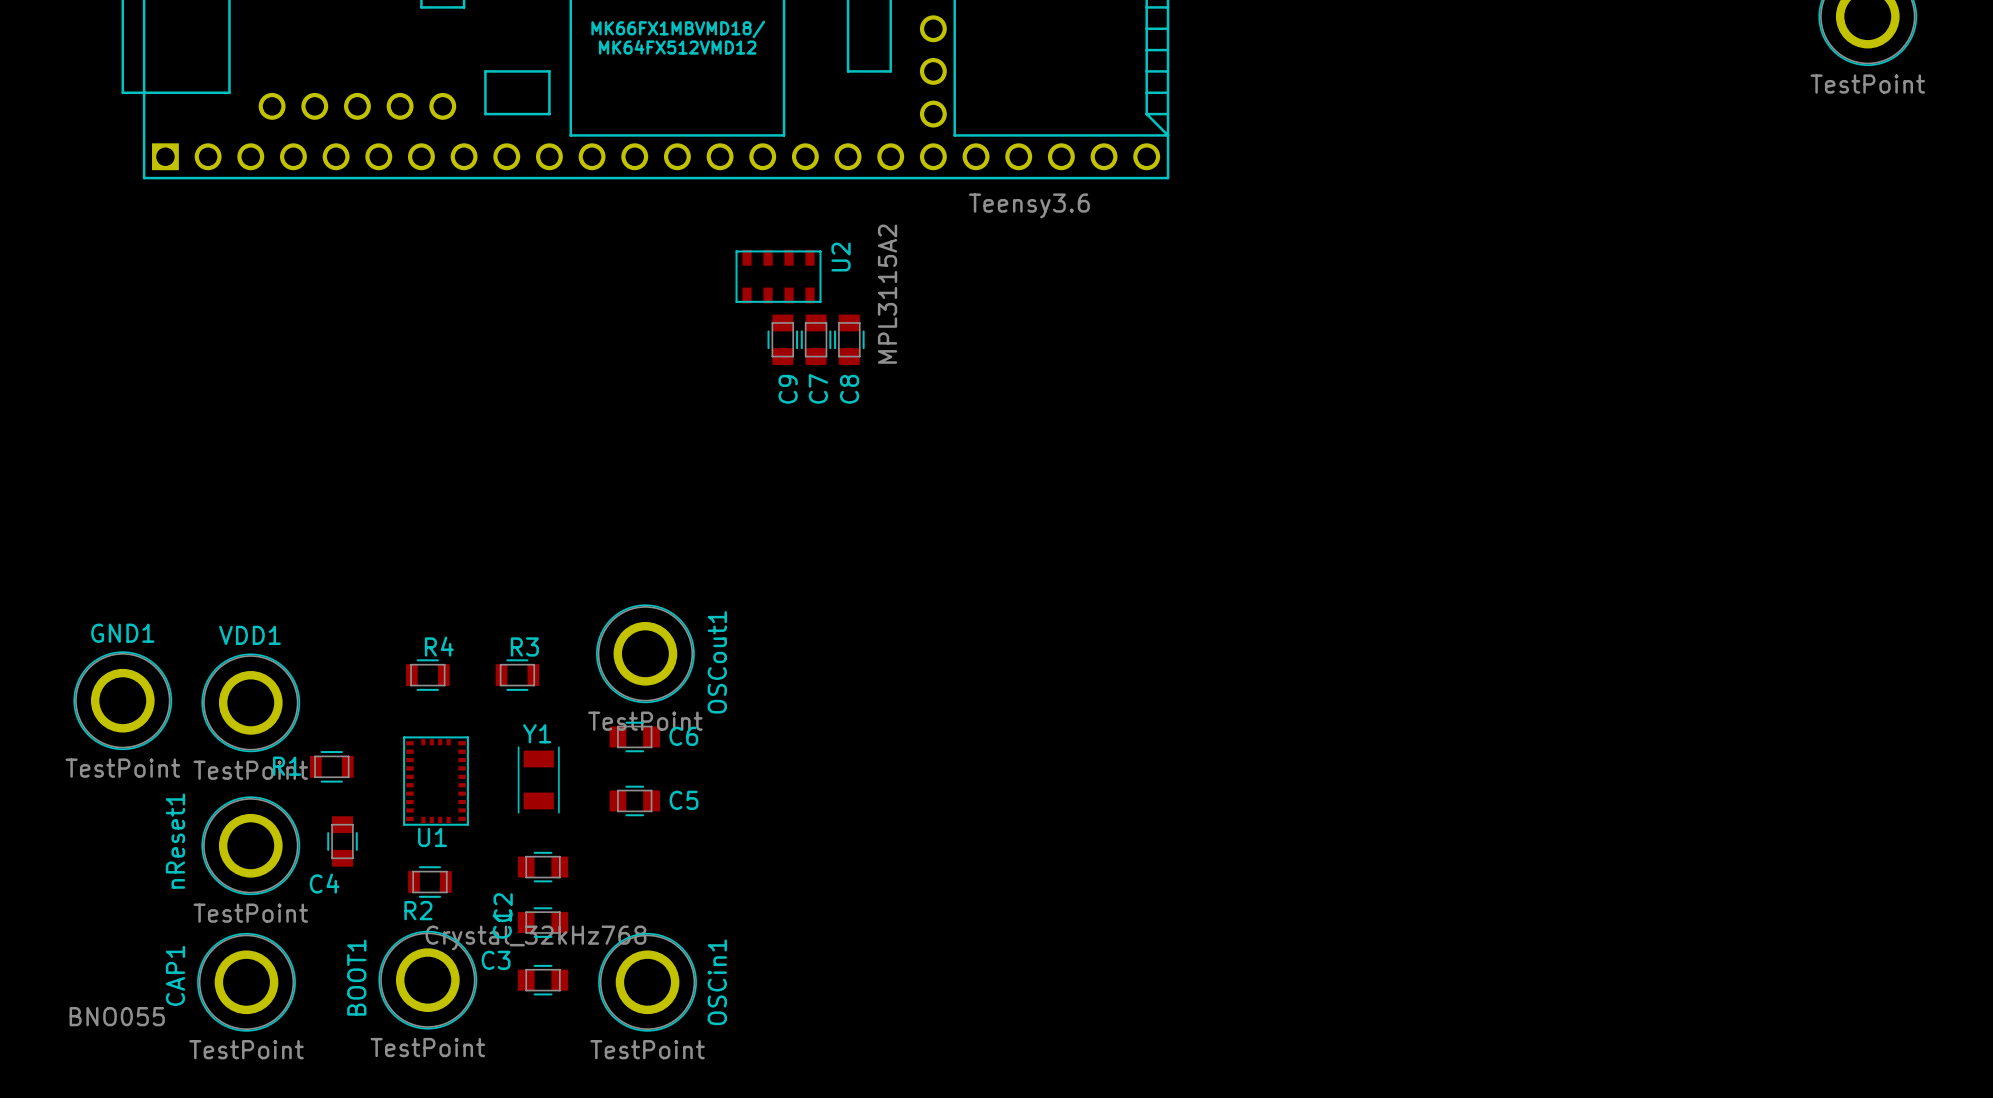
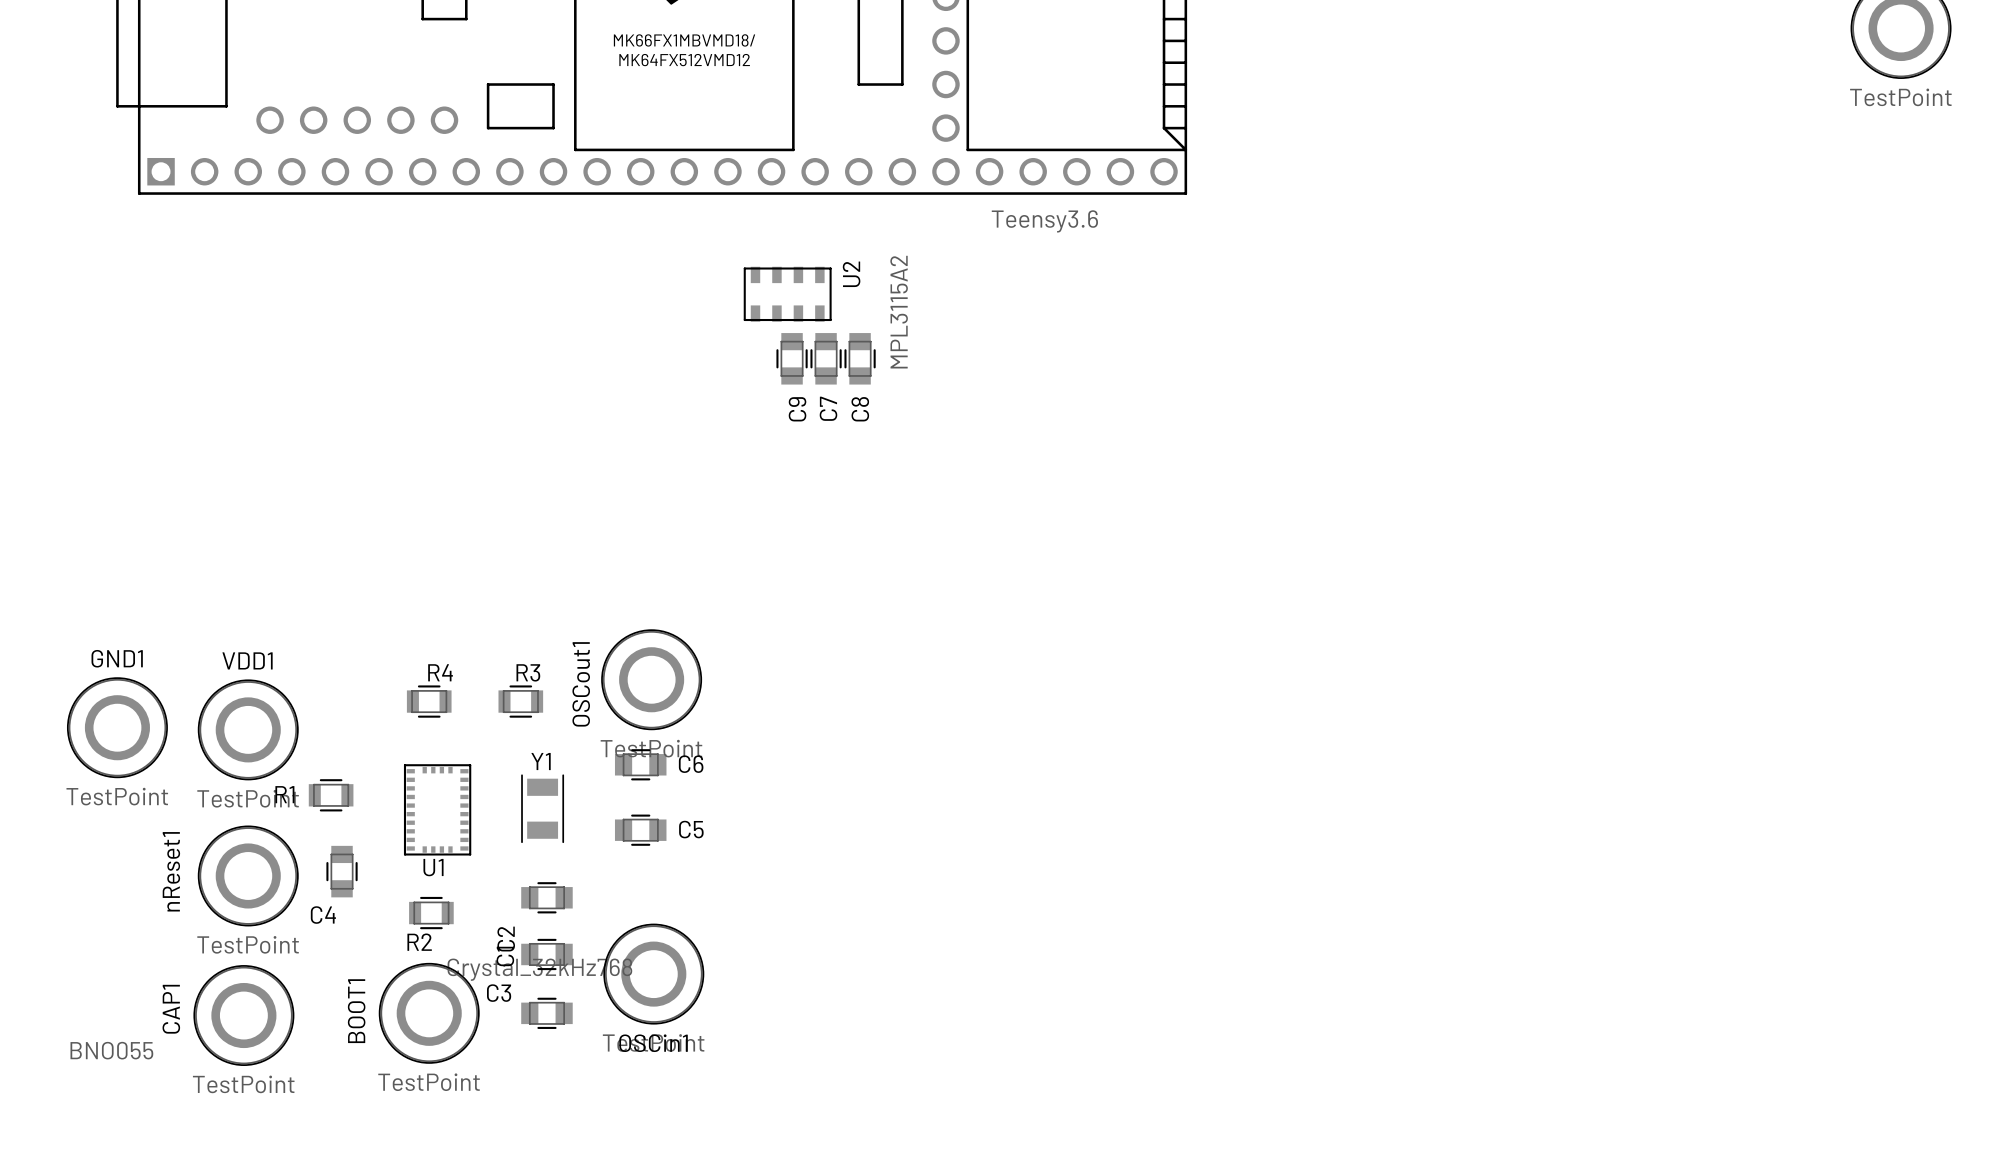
OSCout1 name position: OSCout1 (717, 662) -> OSCout1 (581, 684)
OSCin1 position: (647, 982) -> (653, 974)
OSCin1 name rotation: 0° (717, 982) -> 90° clockwise (653, 1043)

